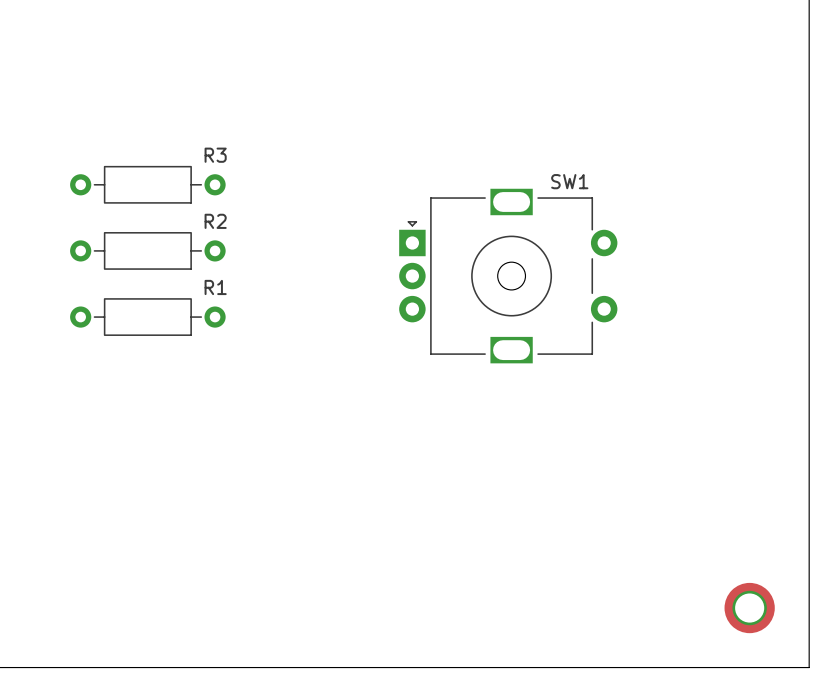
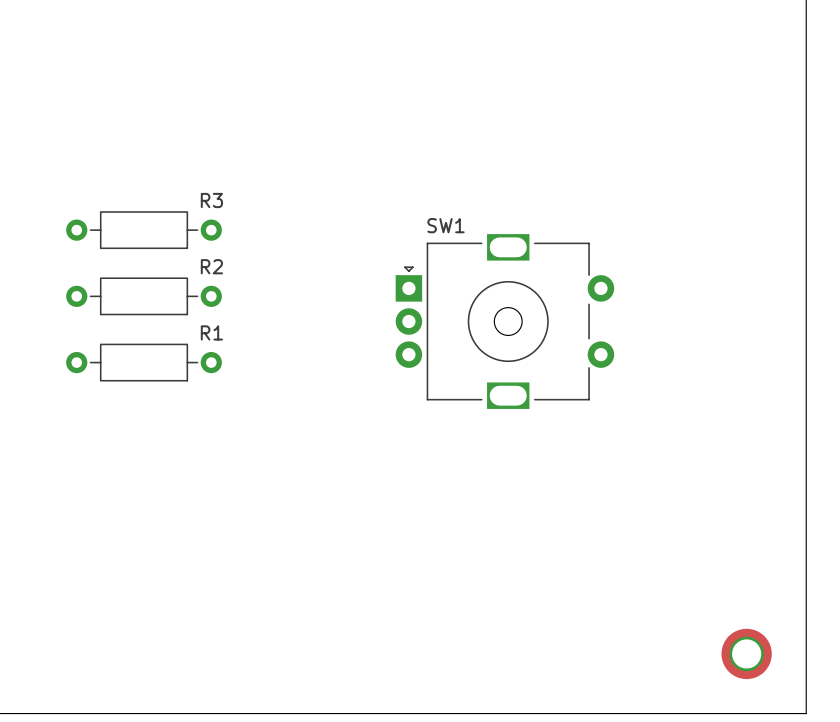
SW1 name position: SW1 (569, 181) -> SW1 (445, 225)

